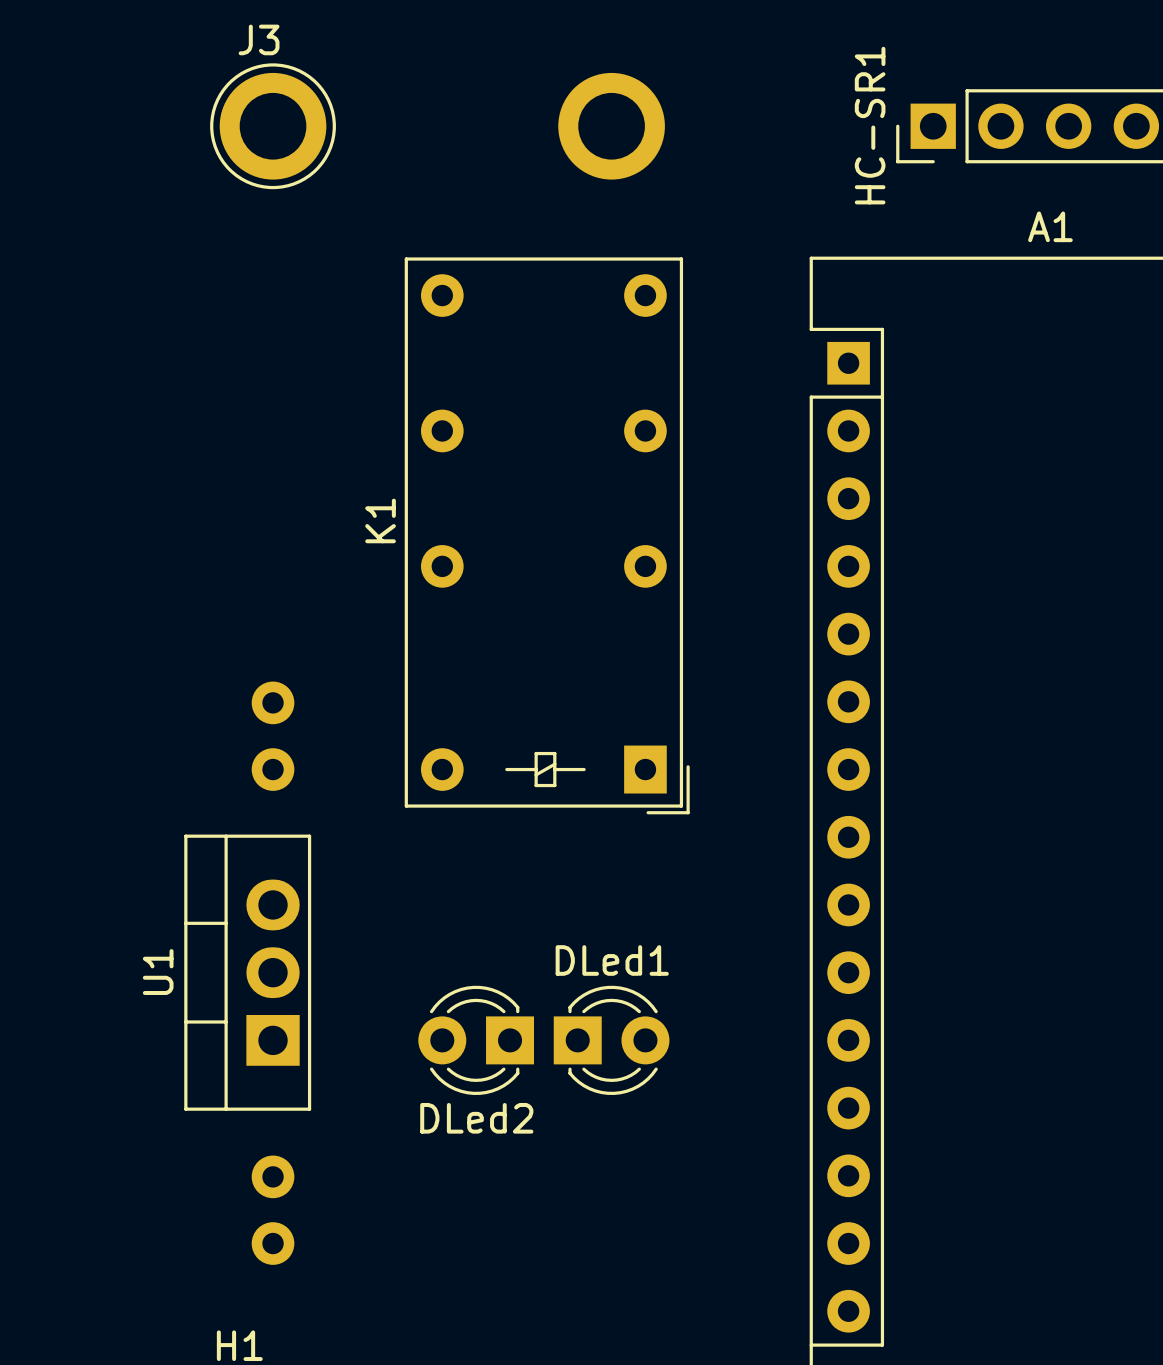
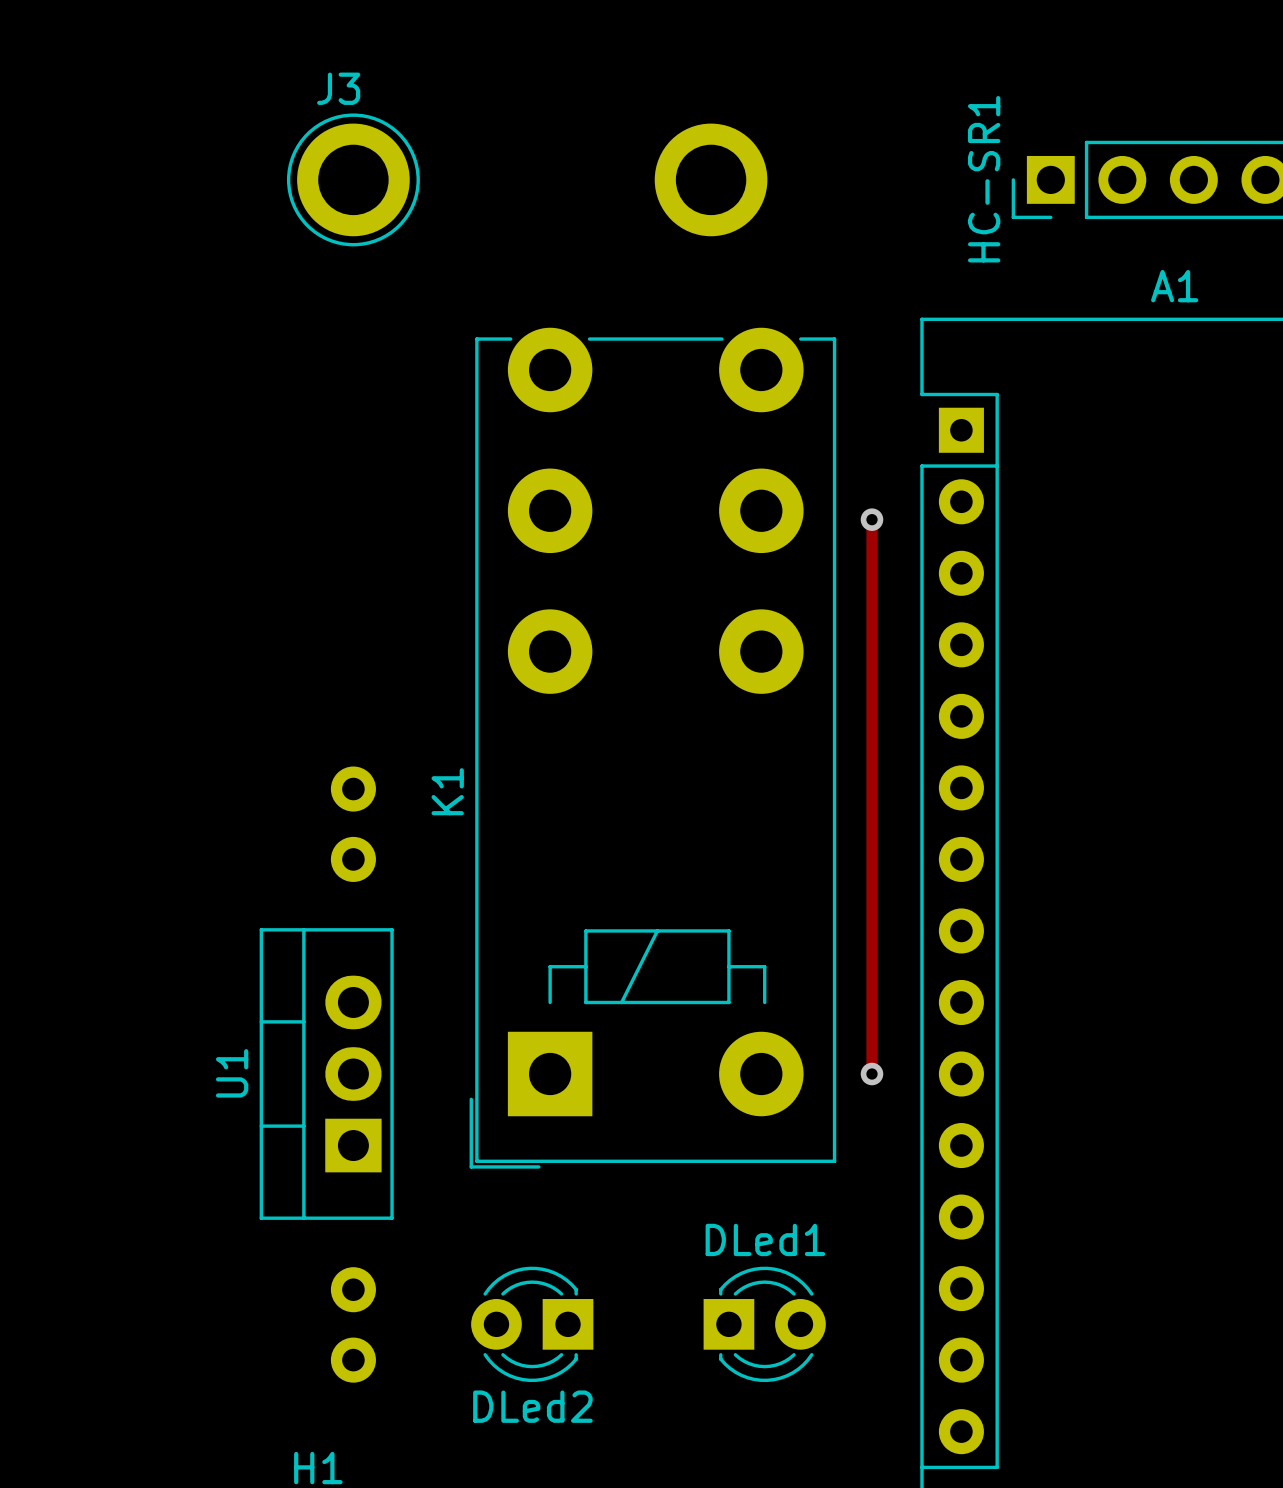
K1 footprint: [404, 257, 690, 815] -> [469, 327, 837, 1169]
track: none -> (871, 519) (871, 1074)
via: none -> (871, 519)
K1 name position: K1 (380, 520) -> K1 (447, 791)
via: none -> (871, 1074)
DLed2 position: (476, 1040) -> (532, 1324)
DLed1 position: (611, 1040) -> (764, 1324)

